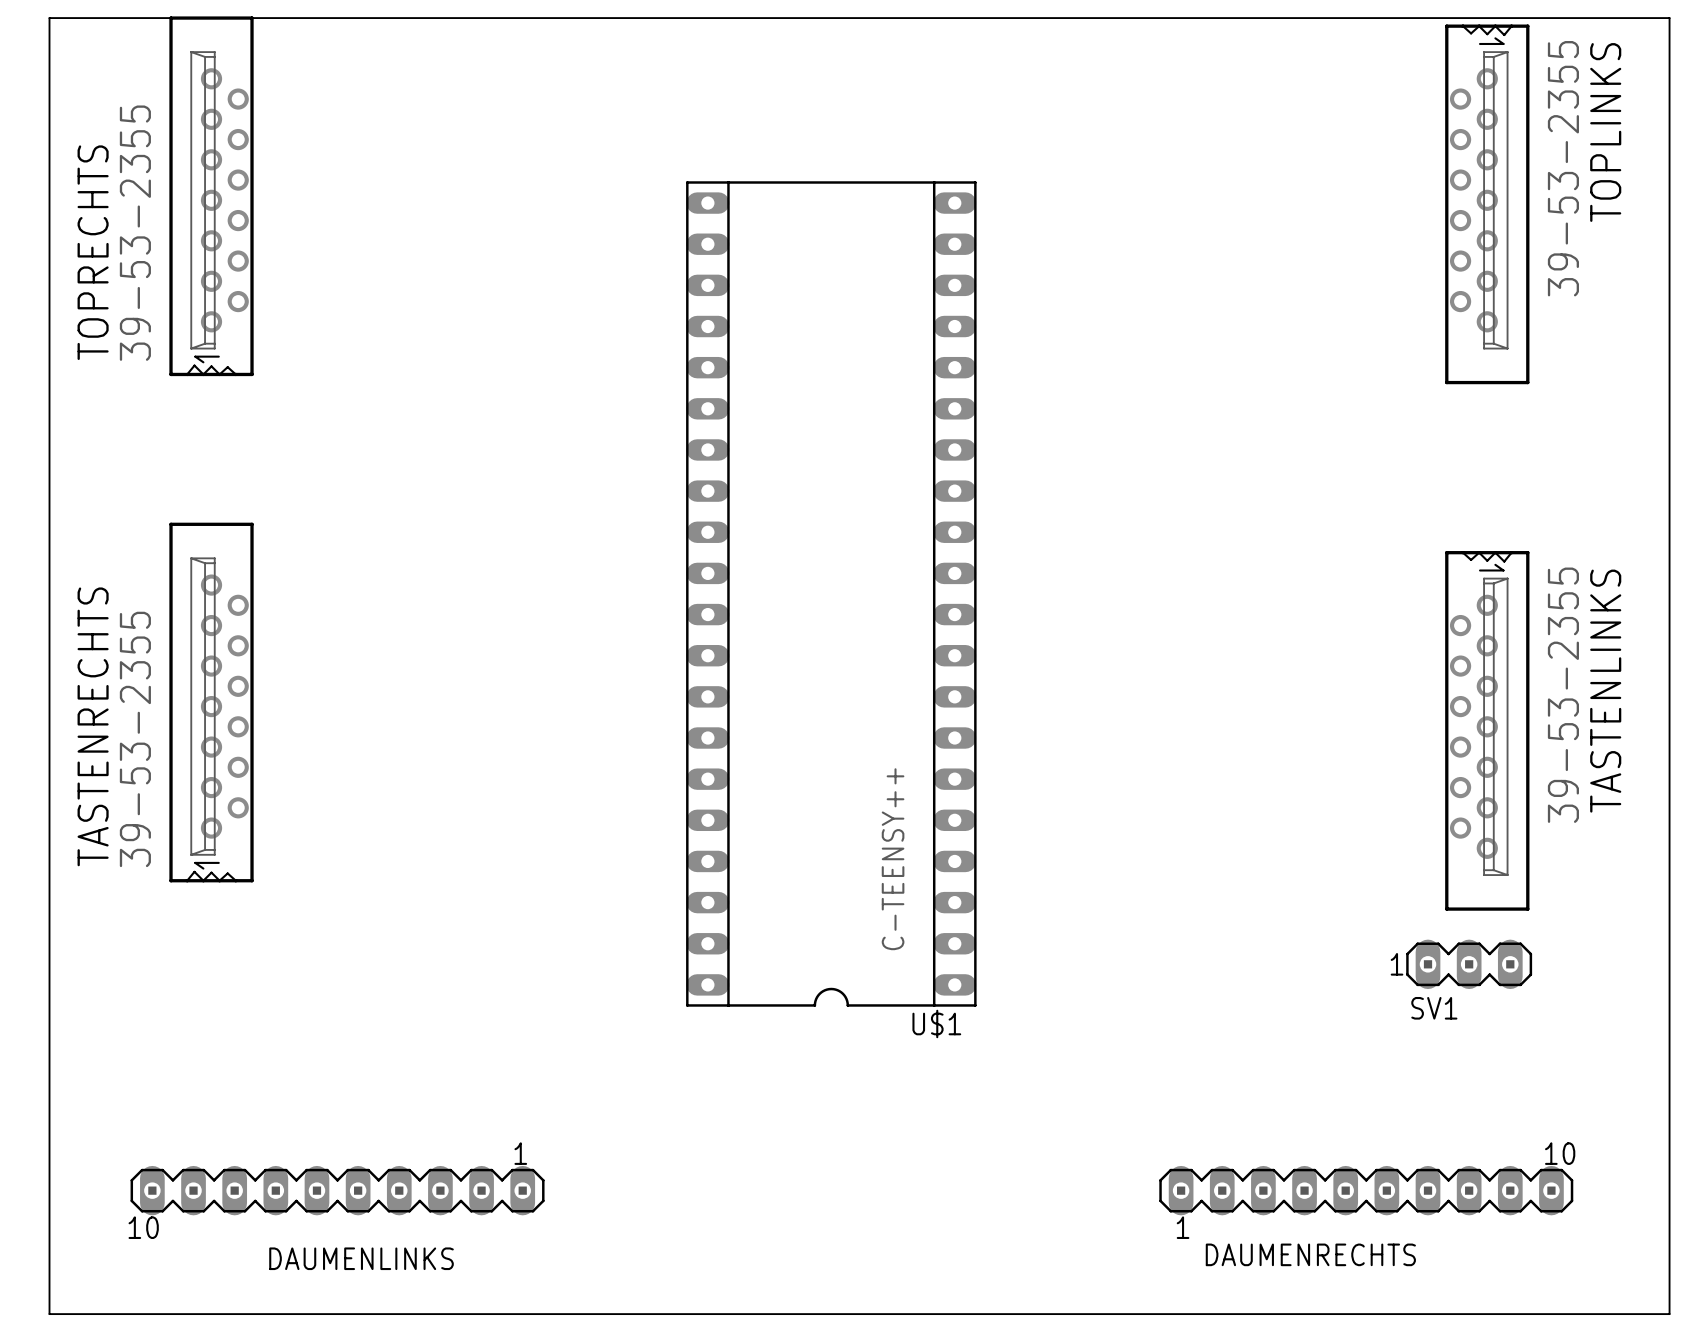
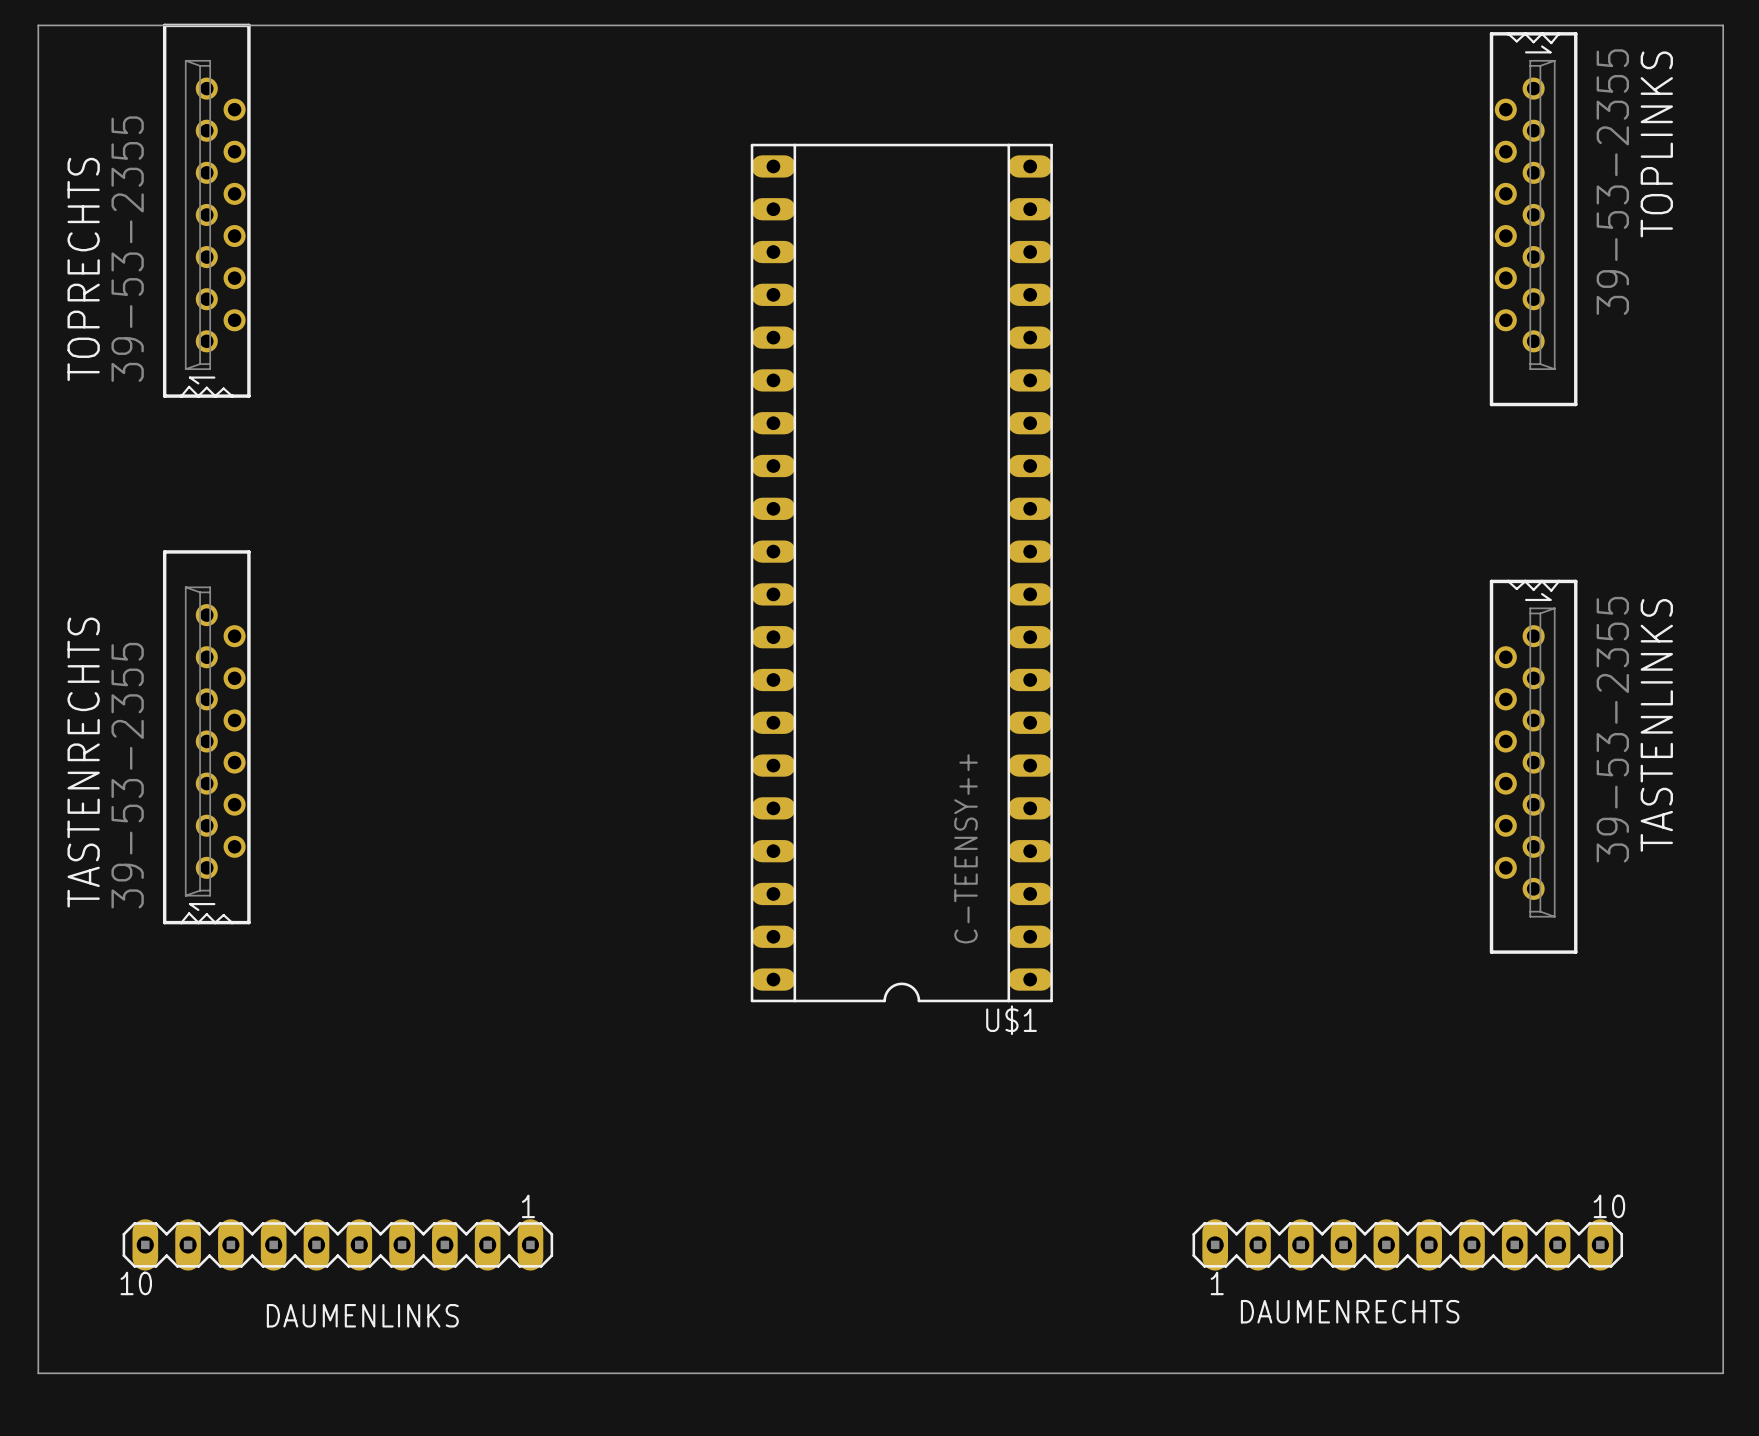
U$1 position: (831, 593) -> (901, 573)
SV1: (1469, 964) -> none

